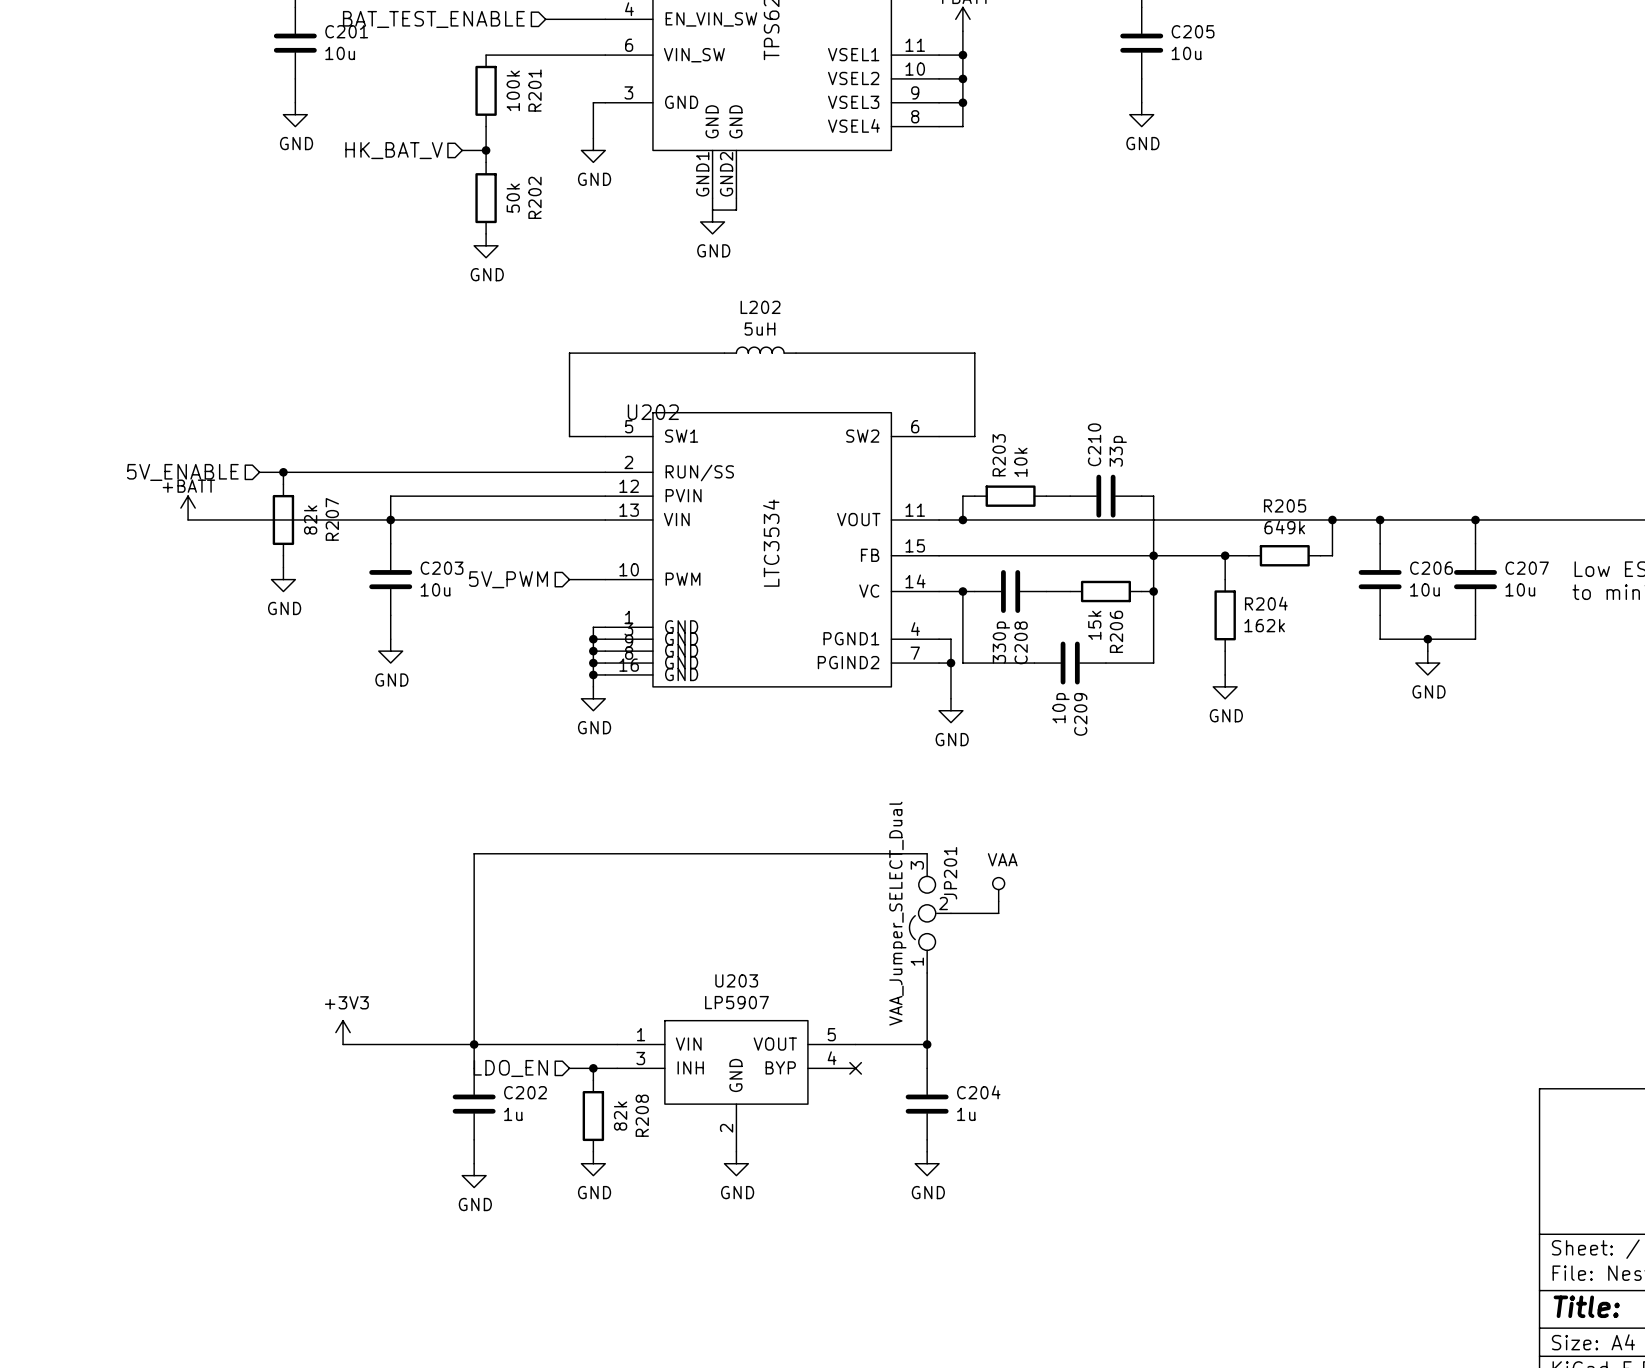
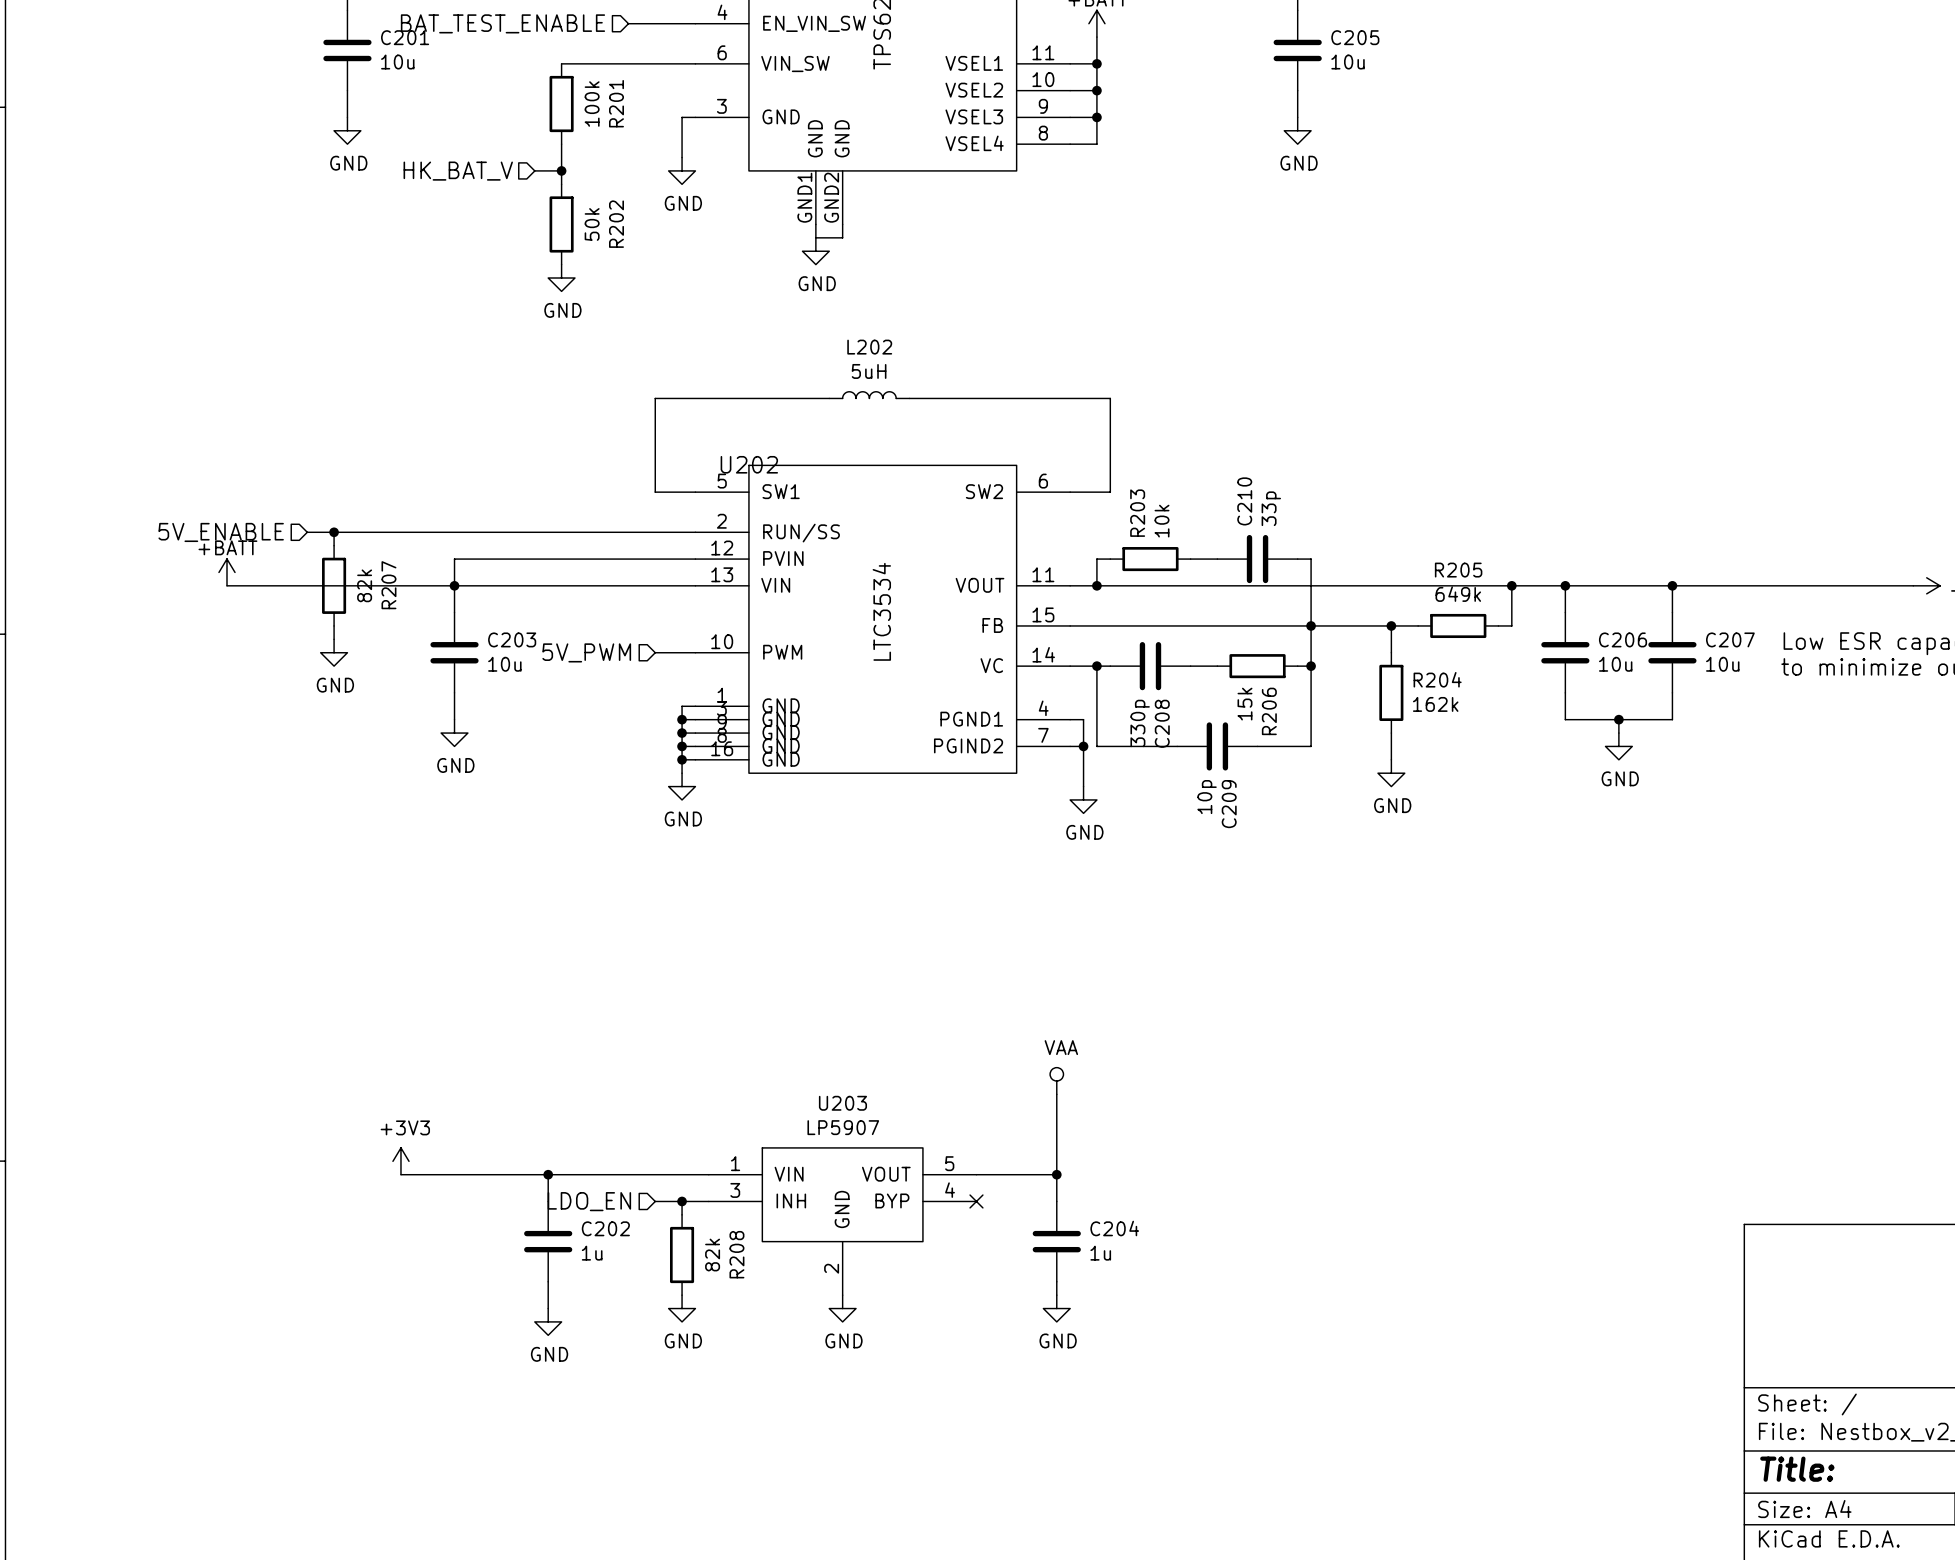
wire: (927, 853) (474, 853) (474, 1044) -> none
power symbol position: VAA (998, 889) -> VAA (1056, 1081)
wire: (998, 901) (998, 913) (950, 913) -> none
JP201: VAA_Jumper_SELECT_Dual (930, 913) -> none

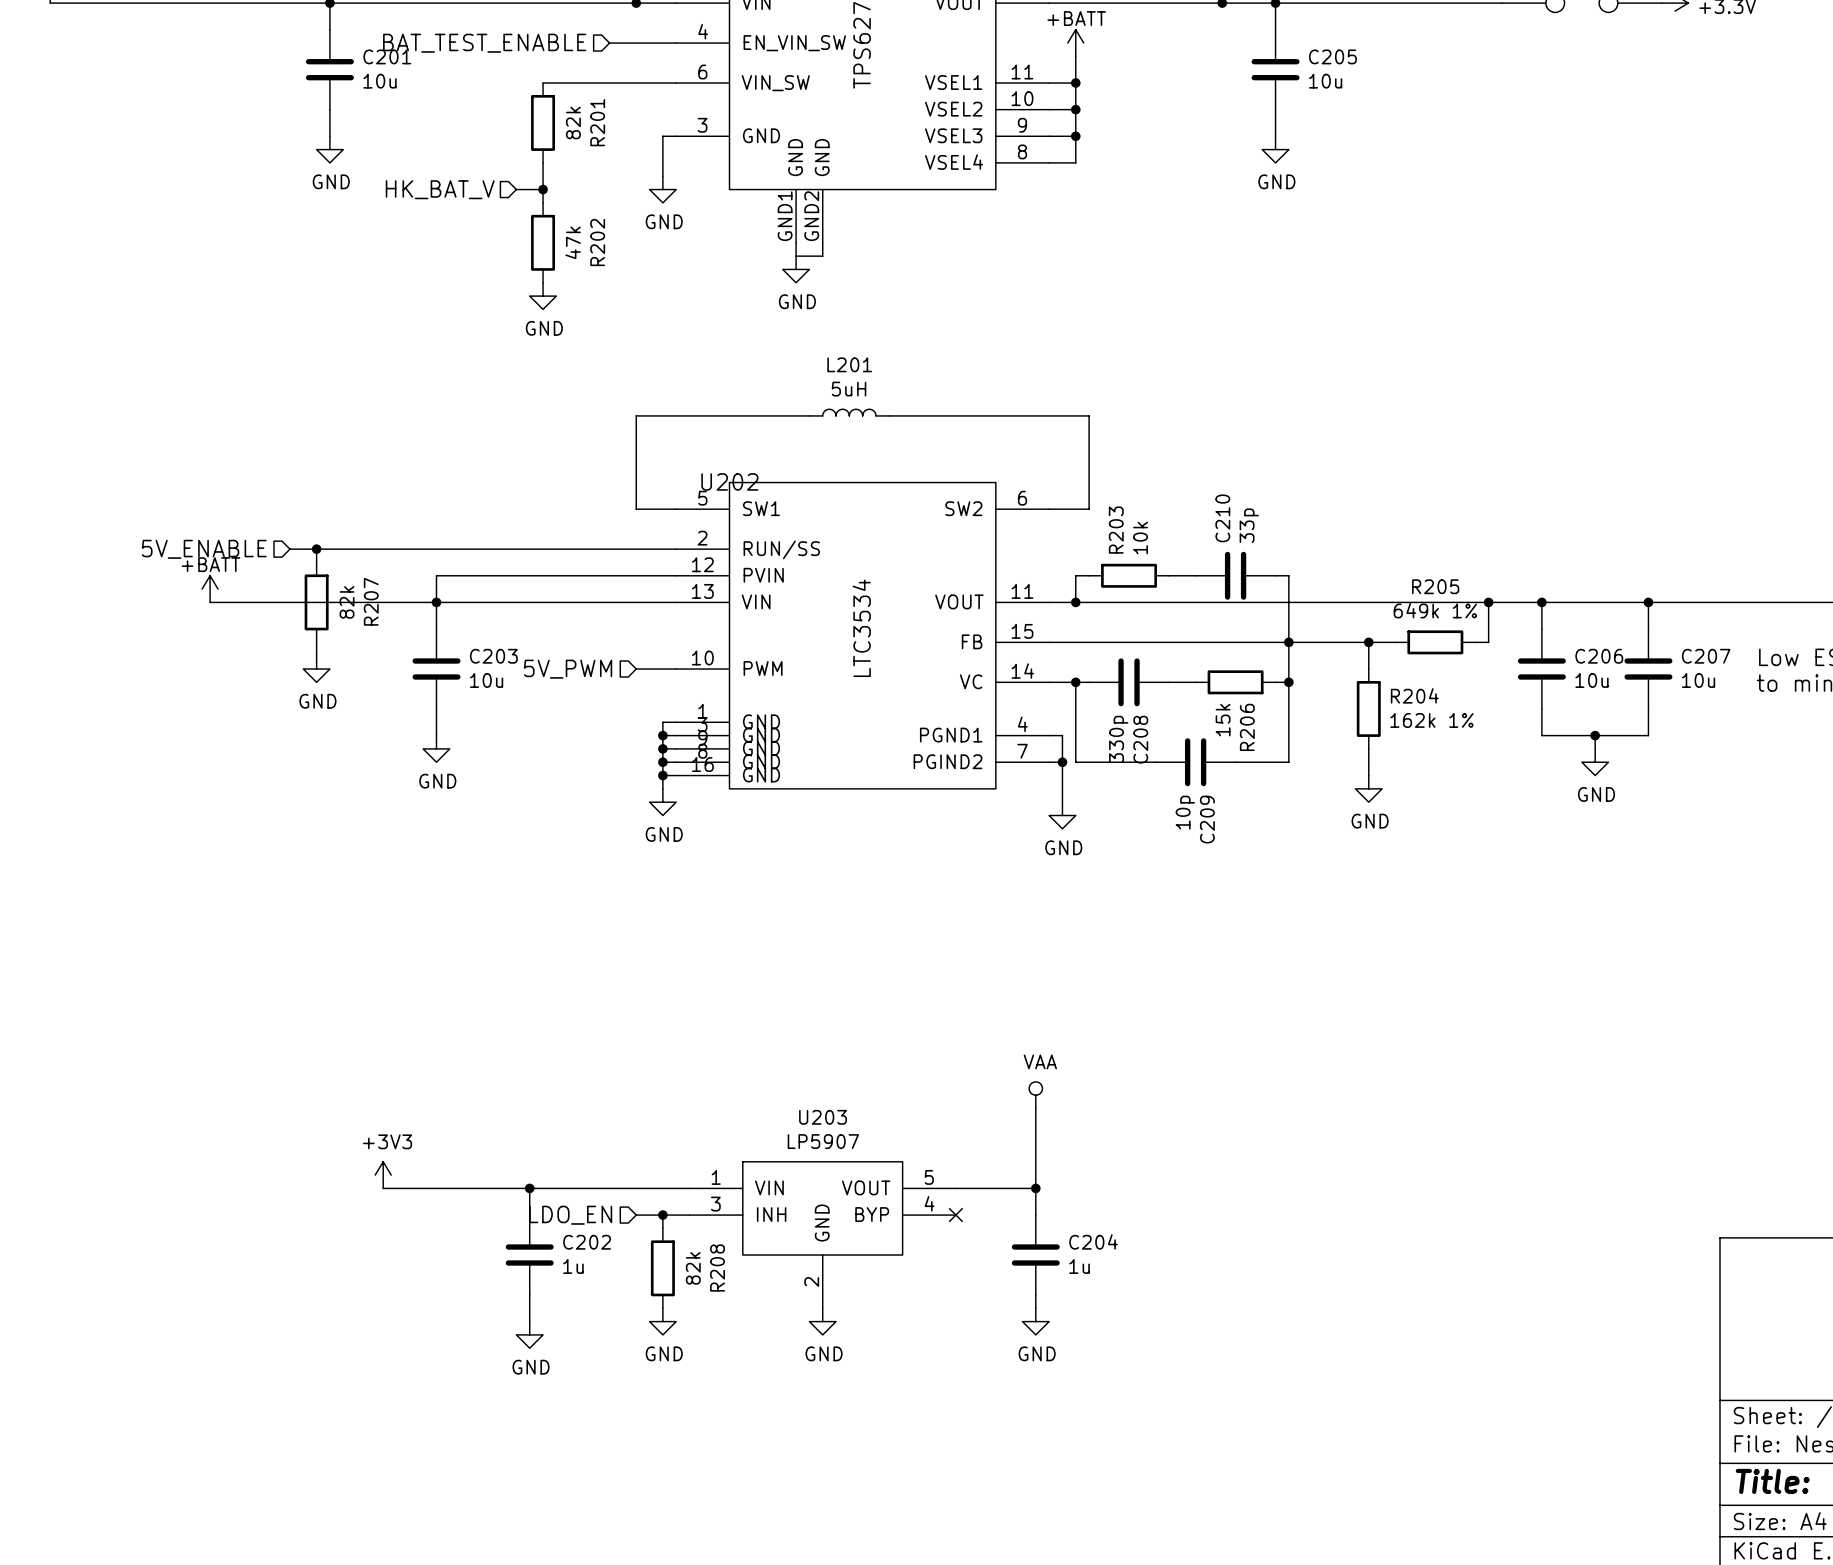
R201 value: 100k (592, 104) -> 82k (573, 122)
R202 value: 50k (592, 224) -> 47k (573, 242)
L202 name: L202 (869, 347) -> L201 (849, 364)
R205 value: 649k (1458, 594) -> 649k 1% (1435, 610)
R204 value: 162k (1435, 704) -> 162k 1% (1431, 720)

